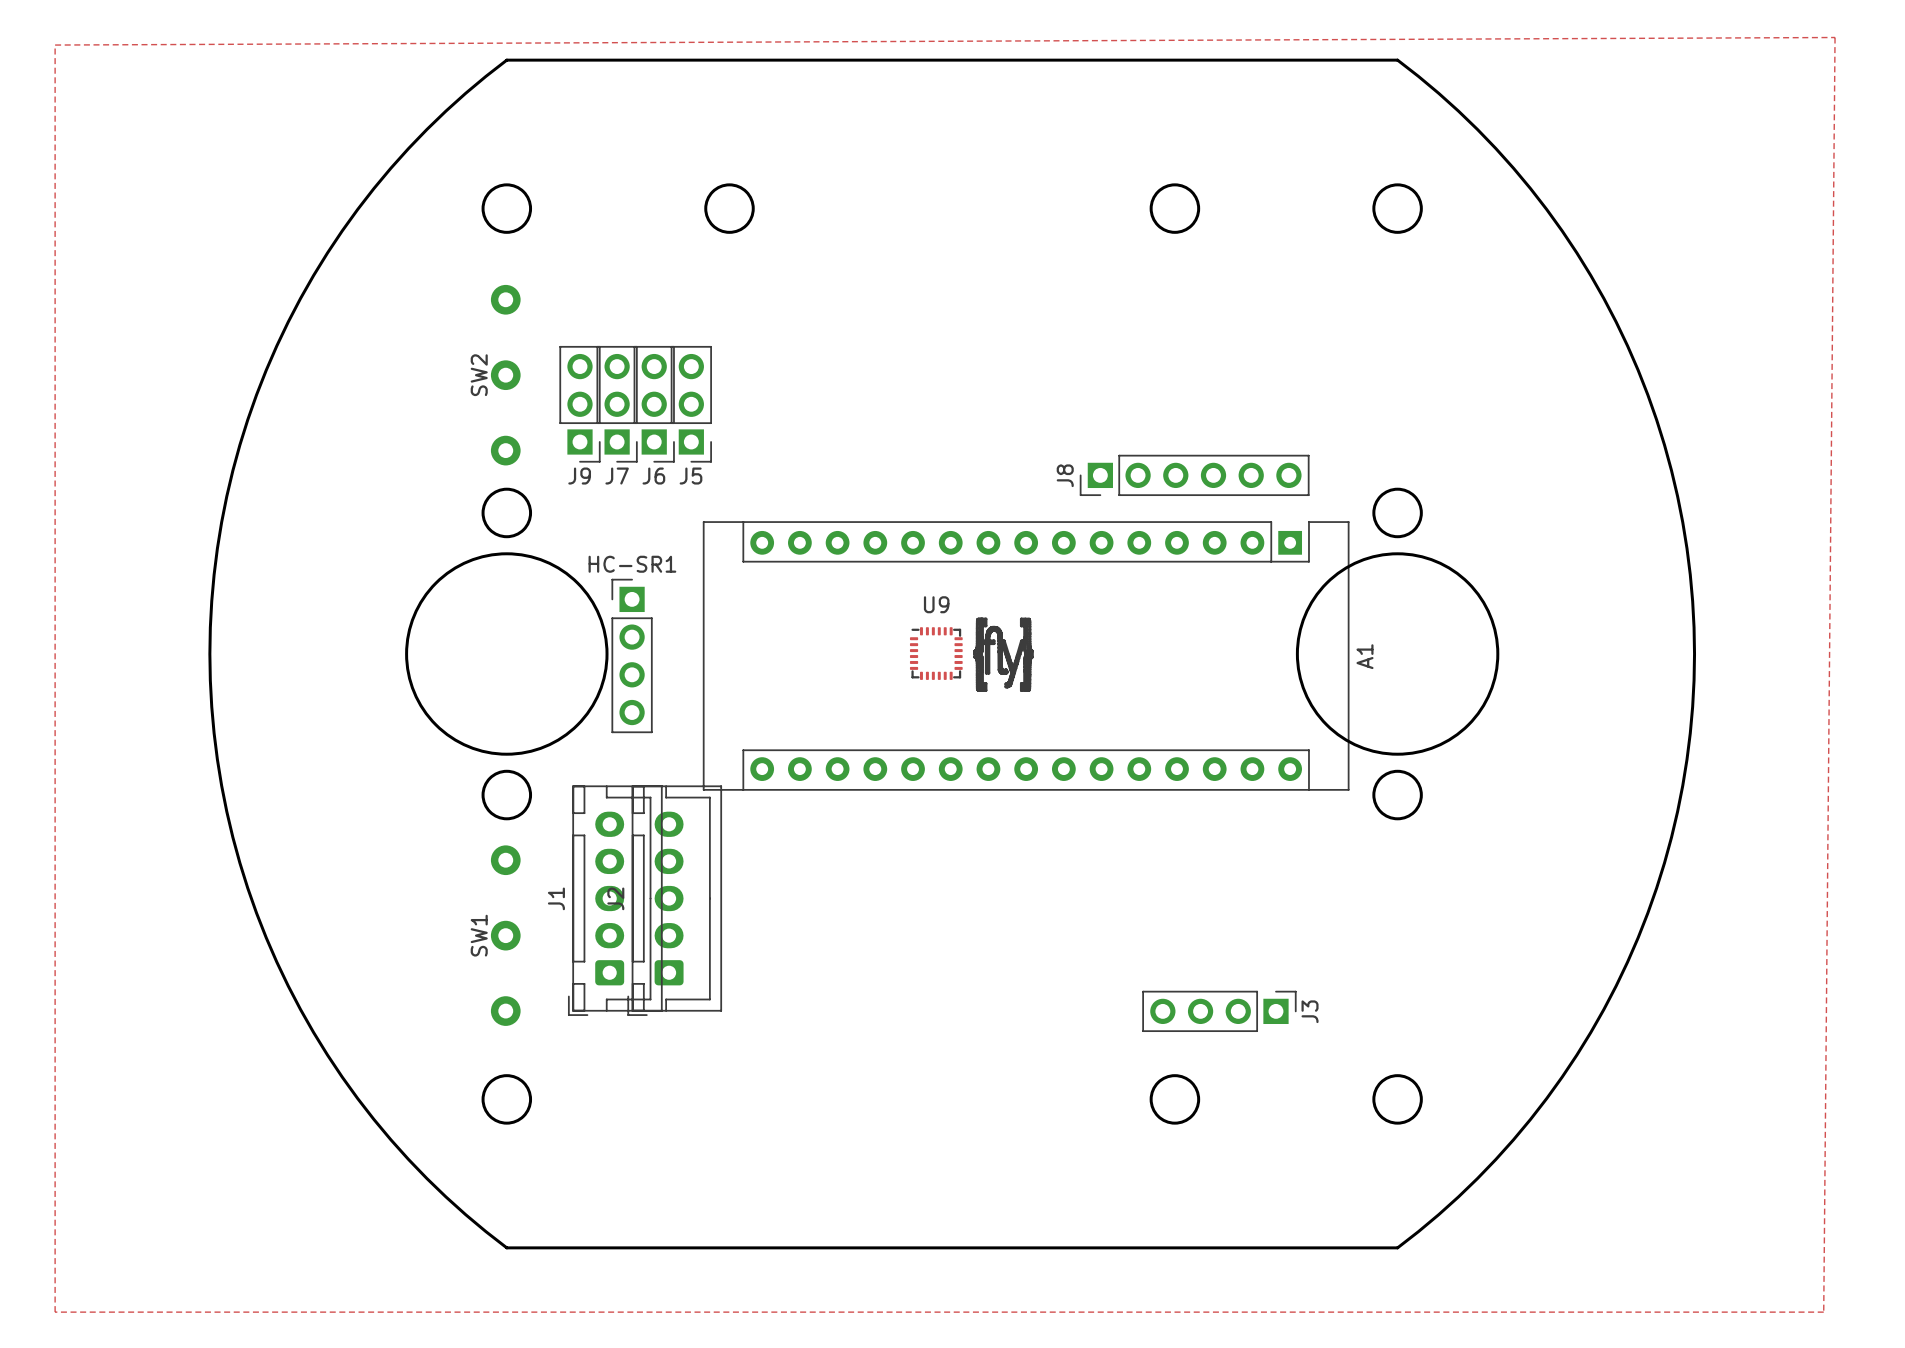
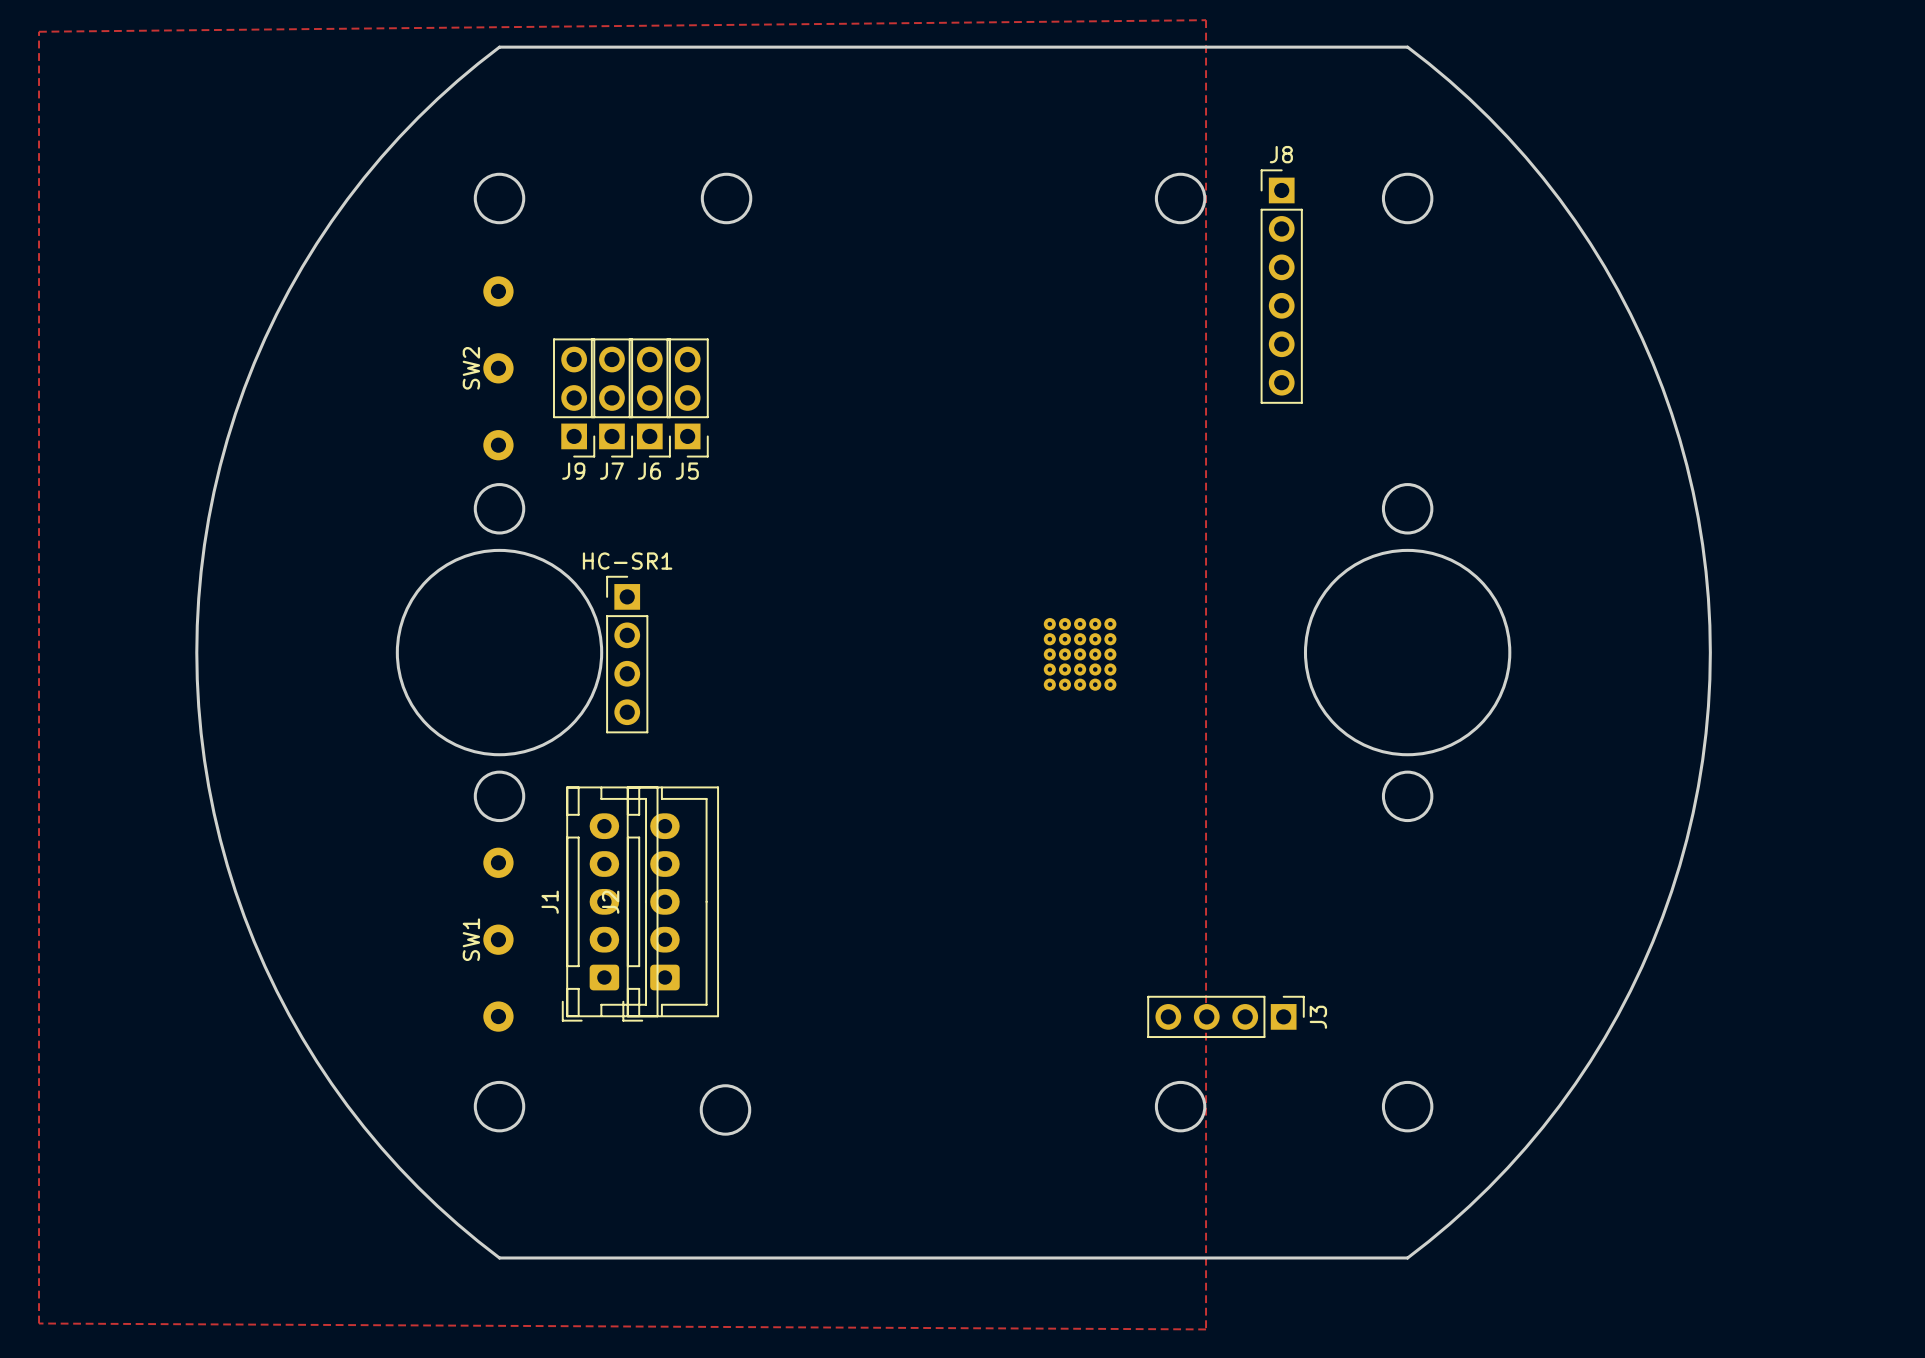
zone outline: (55, 45) (1835, 37) (1823, 1312) (55, 1312) -> (39, 31) (1206, 20) (1206, 1329) (39, 1323)
J8 rotation: 0° (1194, 475) -> 90° clockwise (1281, 286)
J8 position: (1194, 475) -> (1281, 286)
drawing: [973, 617, 1034, 692] -> none
U9: (936, 653) -> none
A1: (1026, 655) -> none
part: none -> (1080, 654)
round board edge: none -> [699, 1084, 752, 1136]

